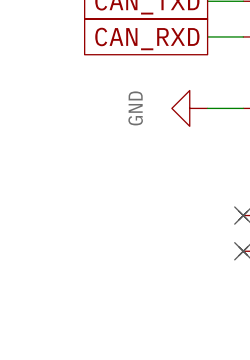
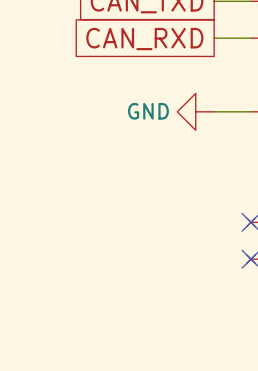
power symbol text rotation: 0° (135, 108) -> 90° clockwise (148, 111)

